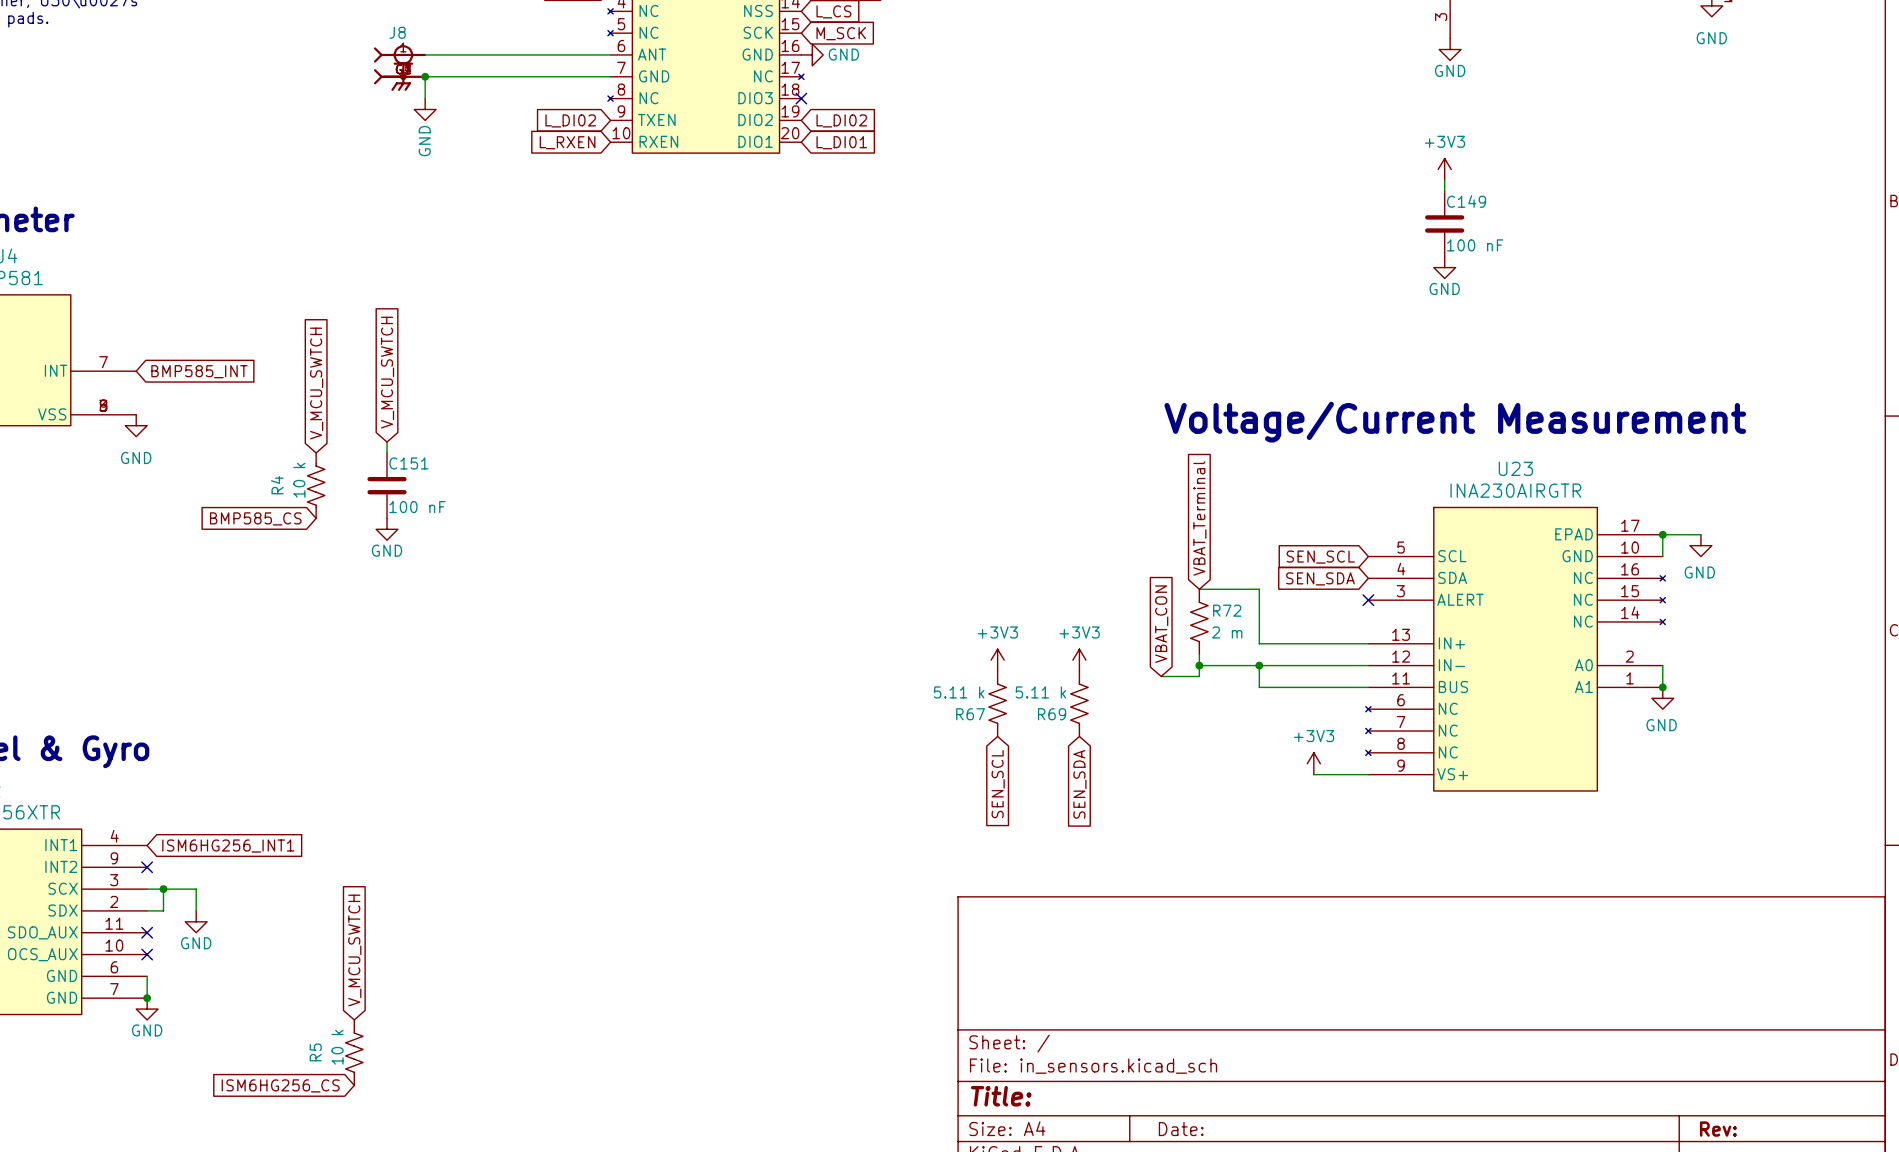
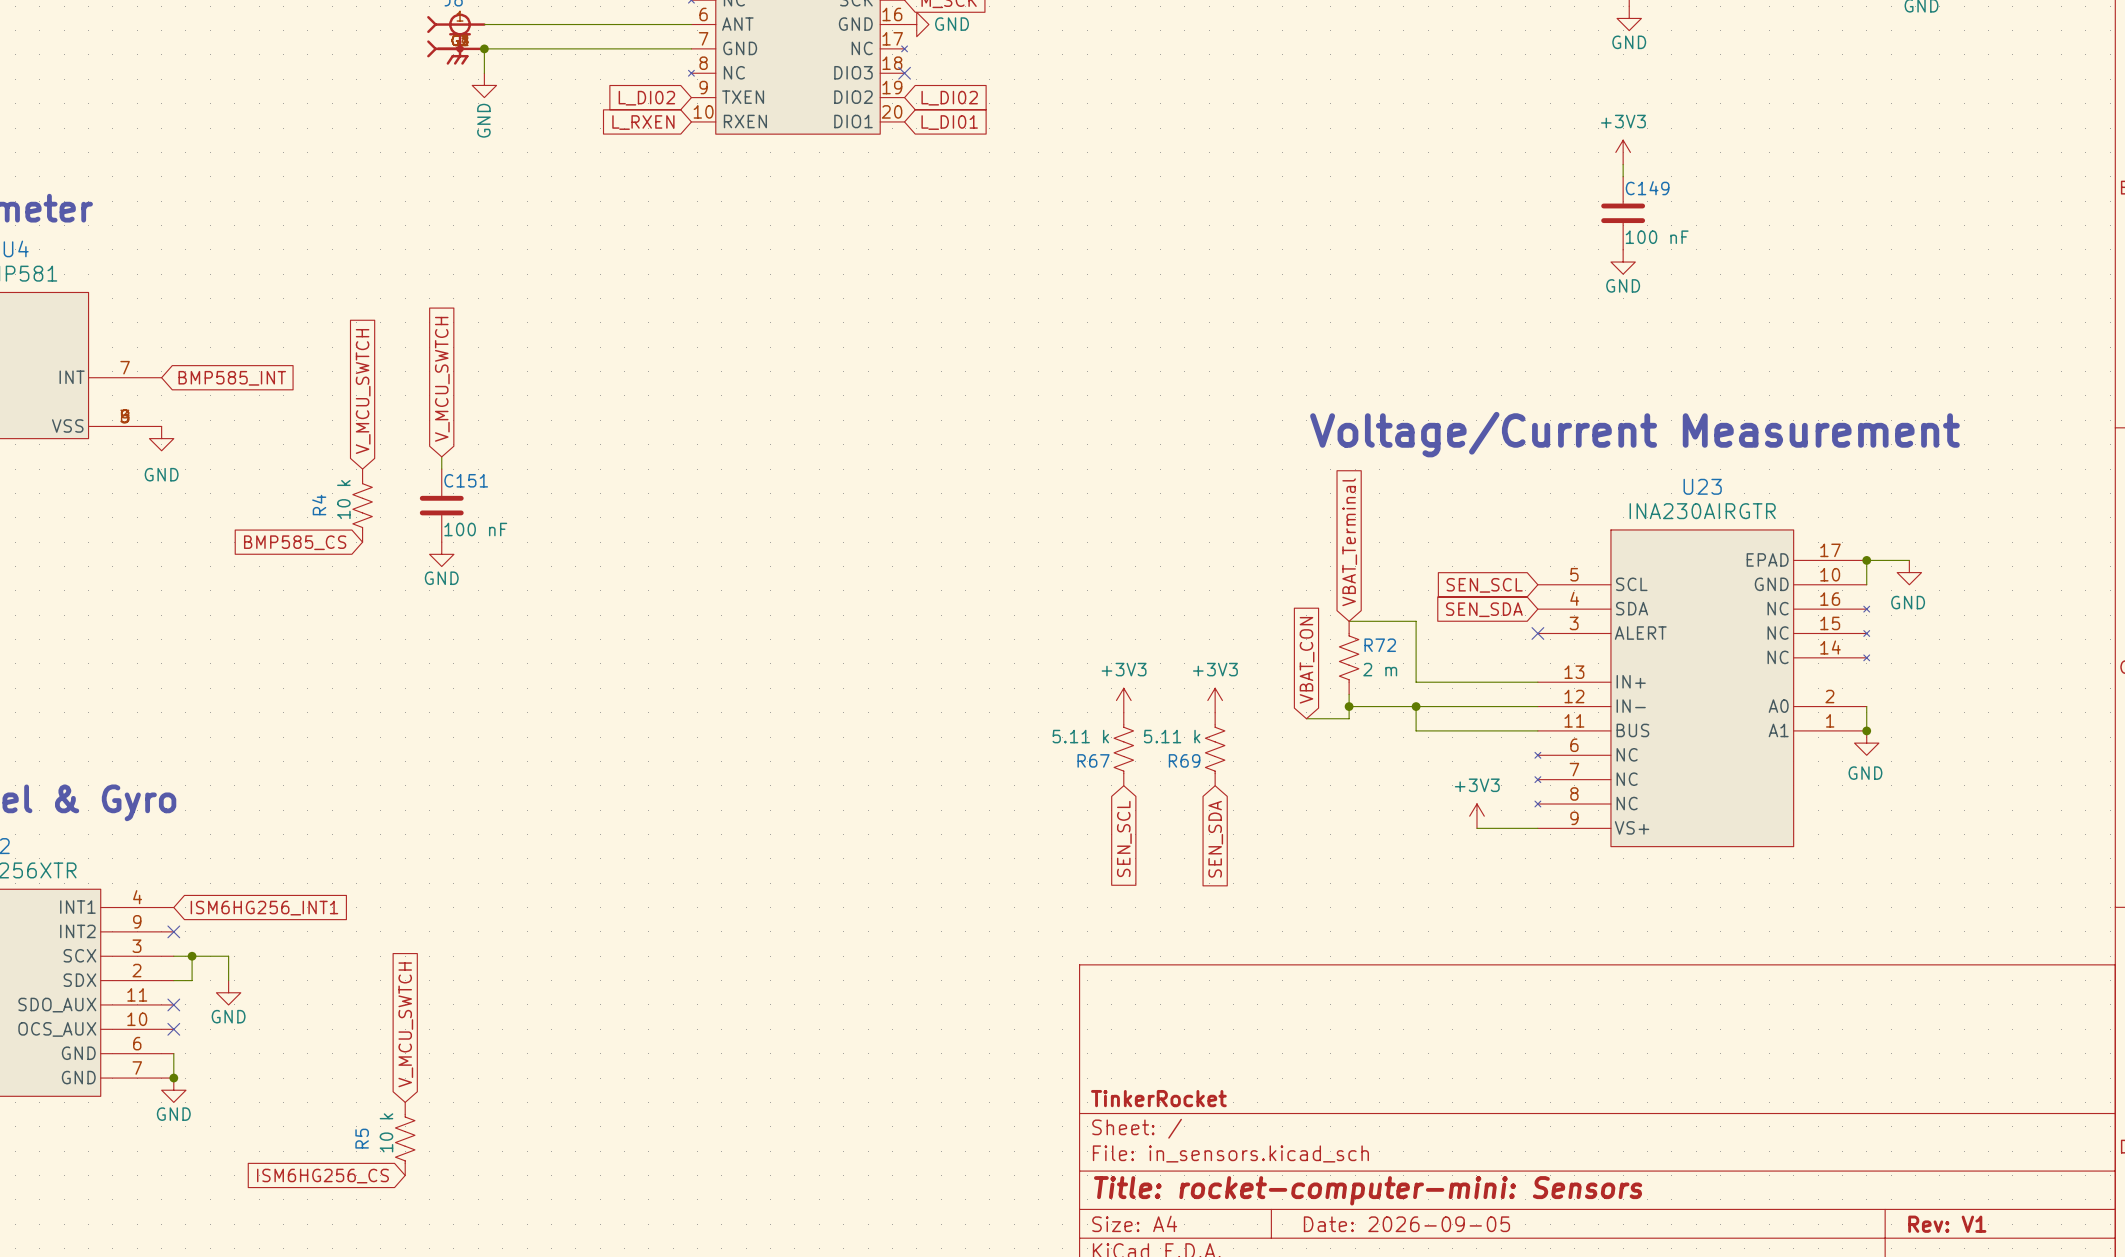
title block: none -> TinkerRocket (1158, 1098)
title block: Title: (1001, 1096) -> Title: rocket-computer-mini: Sensors (1368, 1190)
title block: Date: (1181, 1129) -> Date: 2026-09-05 (1406, 1224)
title block: Rev: (1718, 1129) -> Rev: V1 (1947, 1224)

